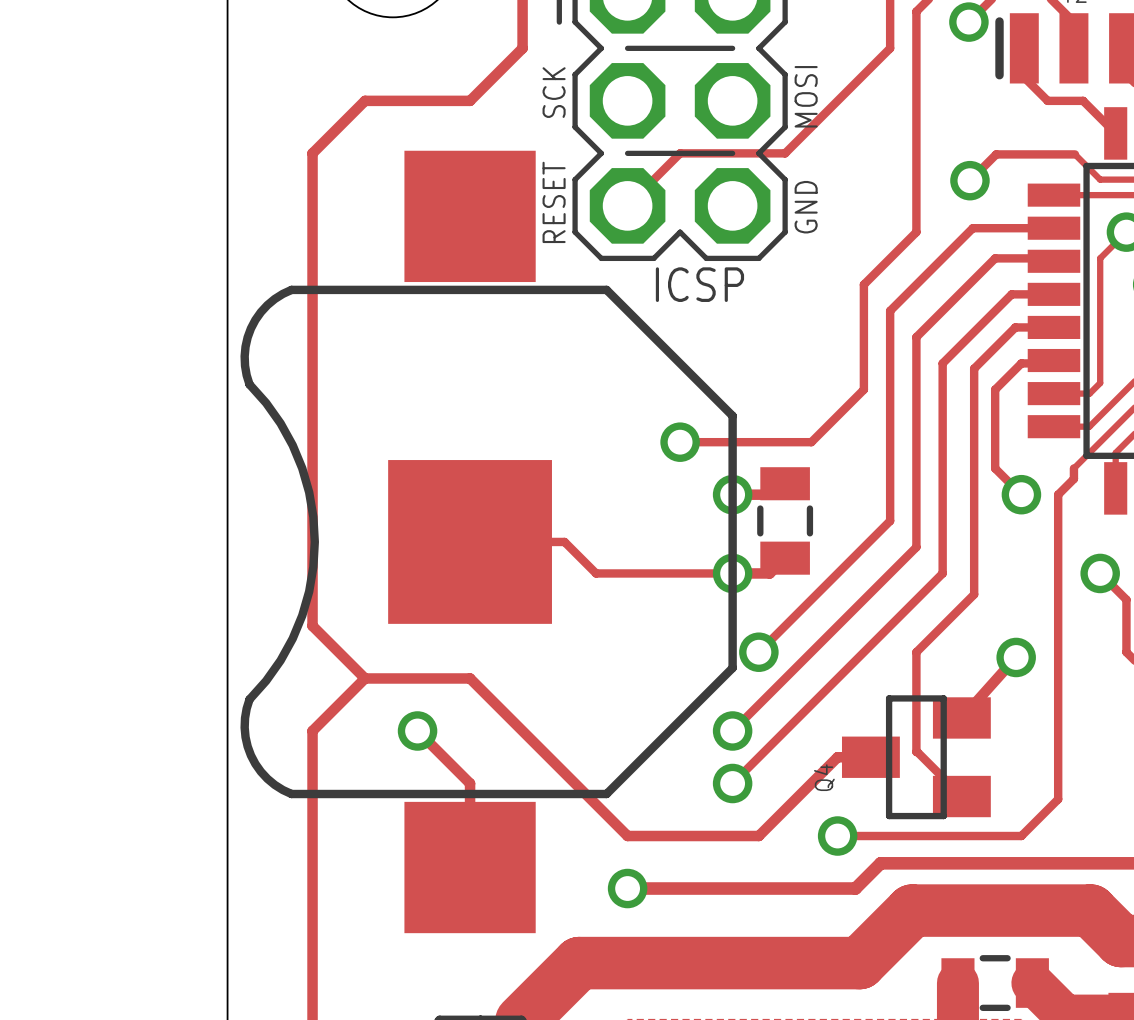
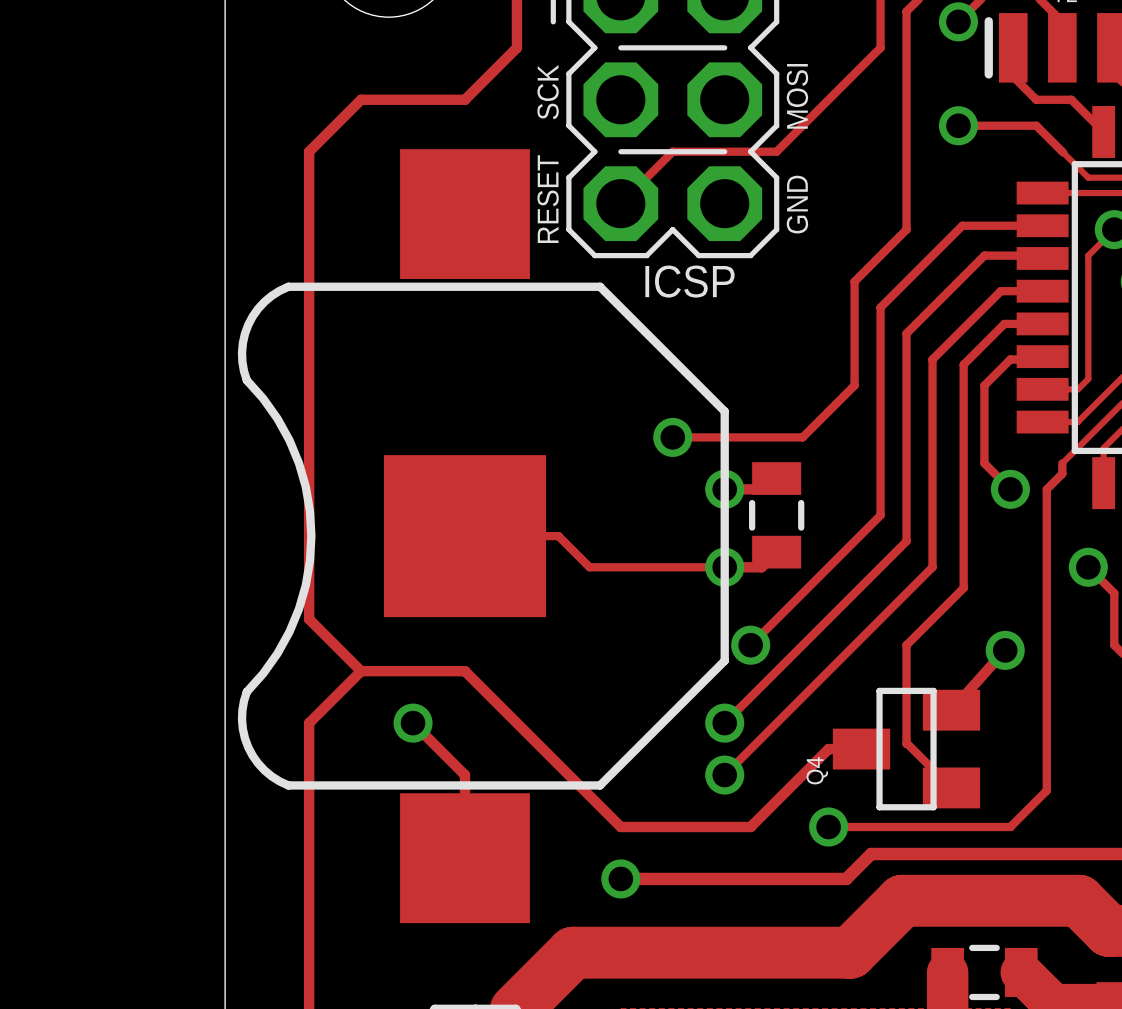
track: (1074, 154) (996, 154) (969, 180) -> (1063, 152) (1036, 125) (958, 125)
via position: (969, 180) -> (958, 125)

